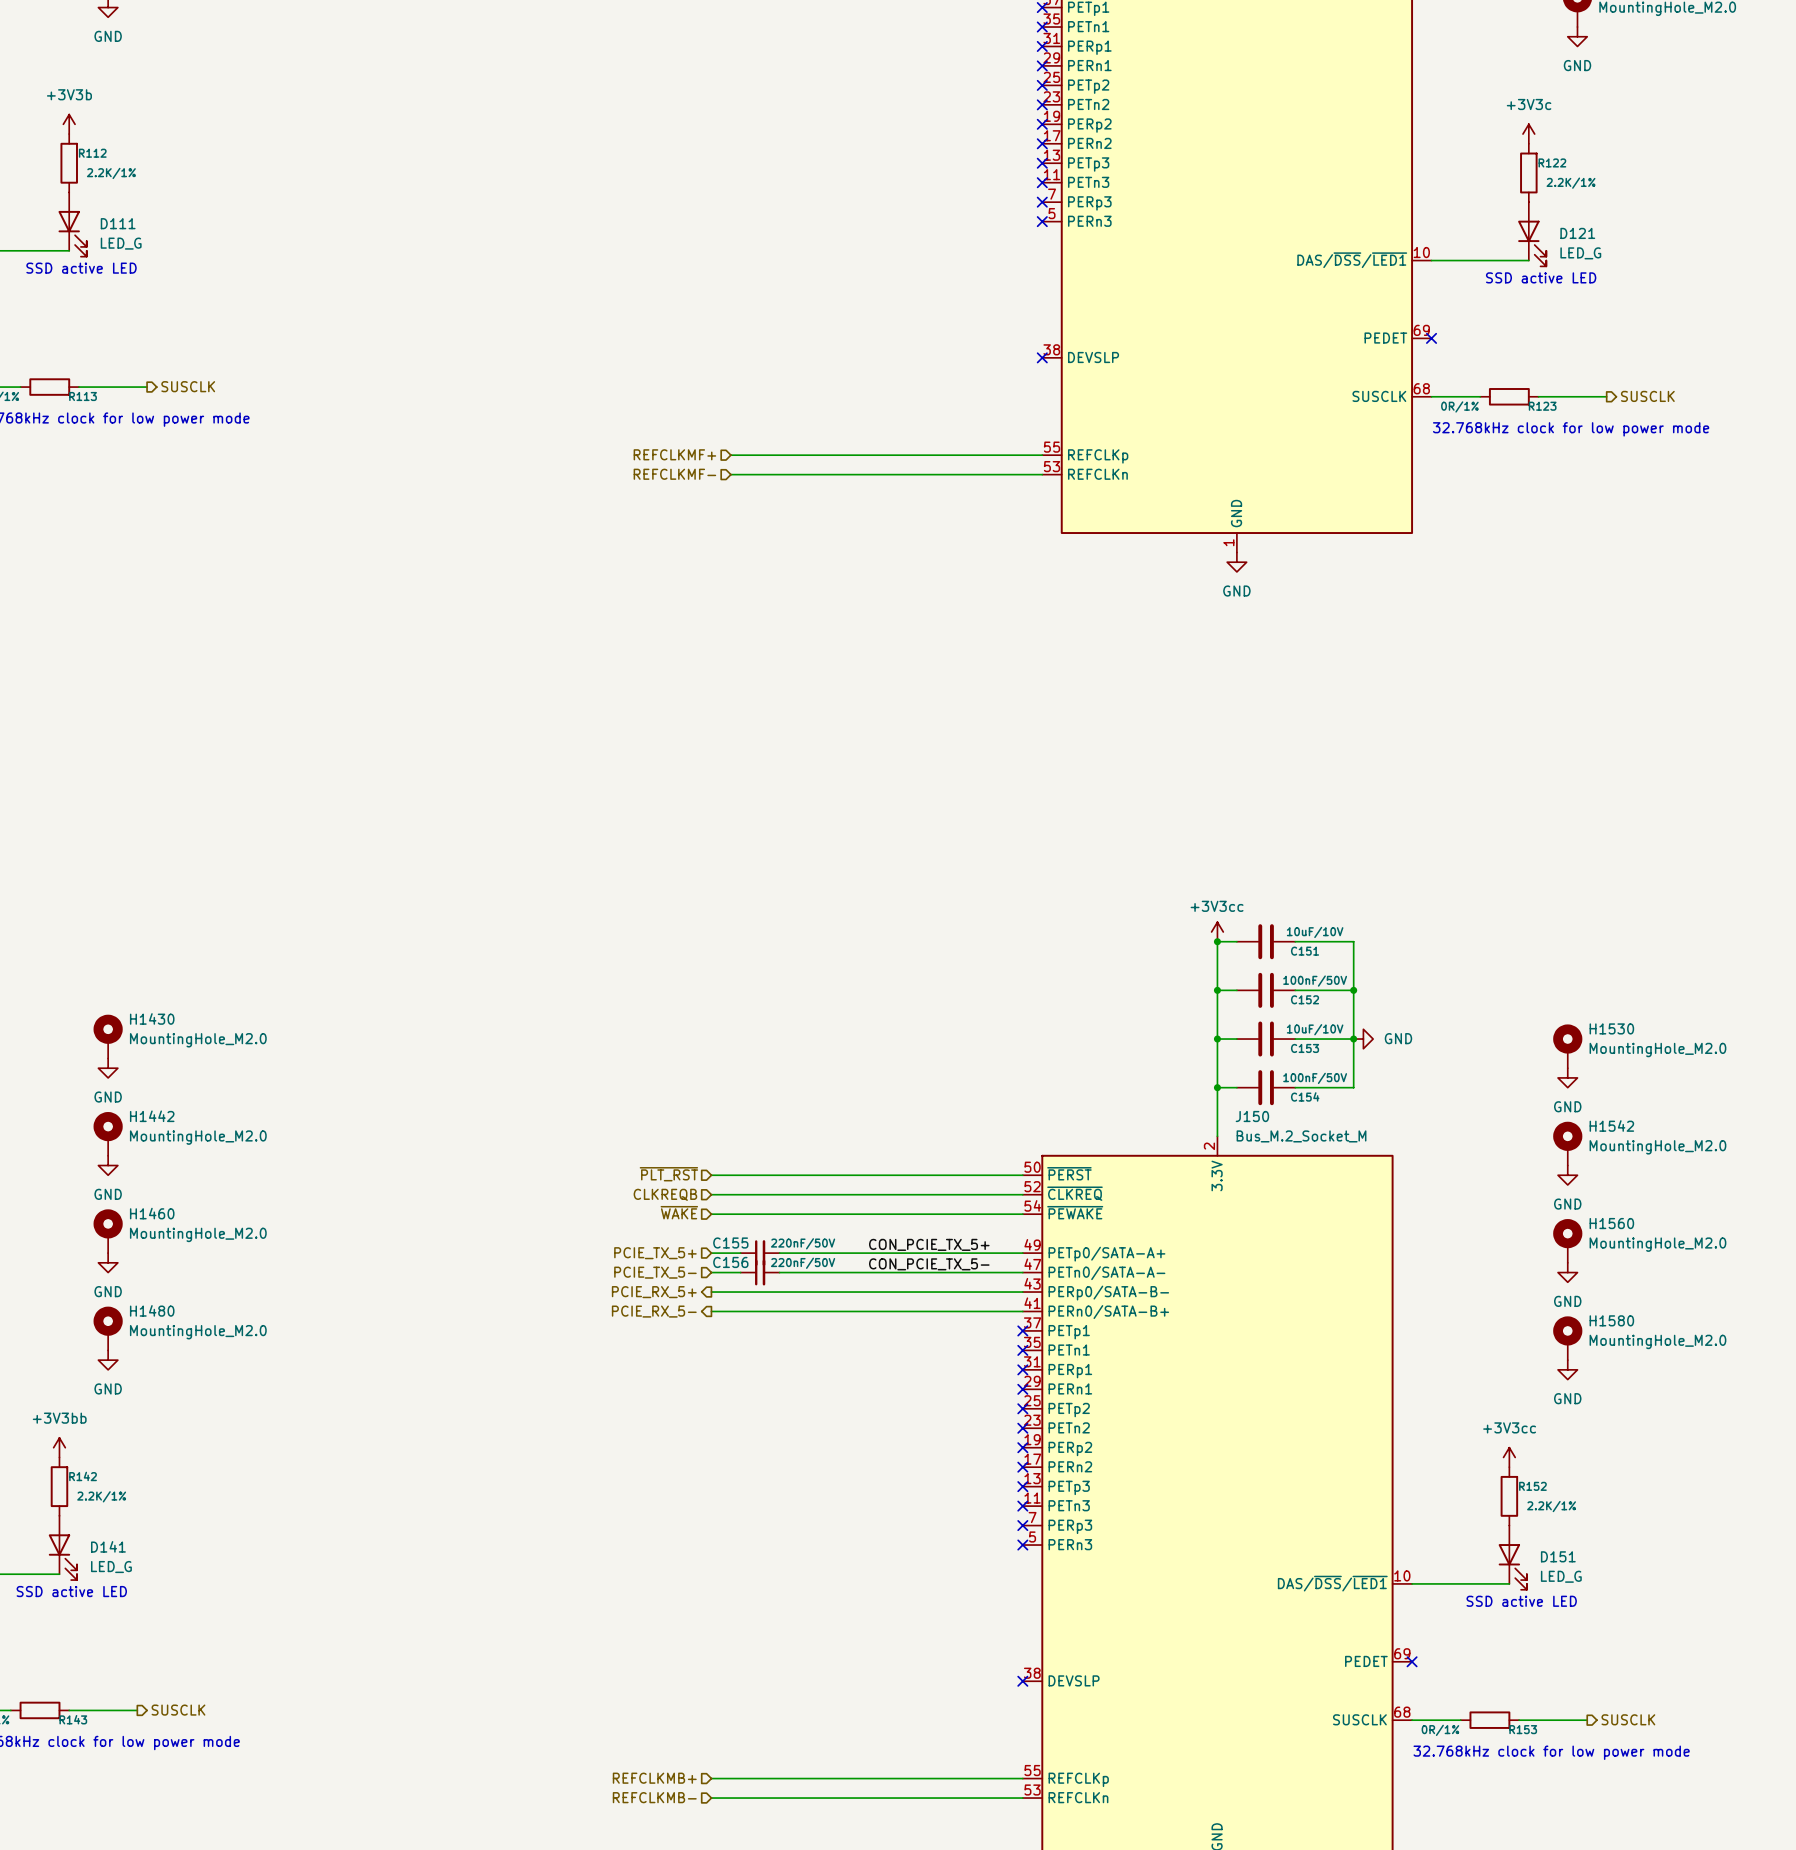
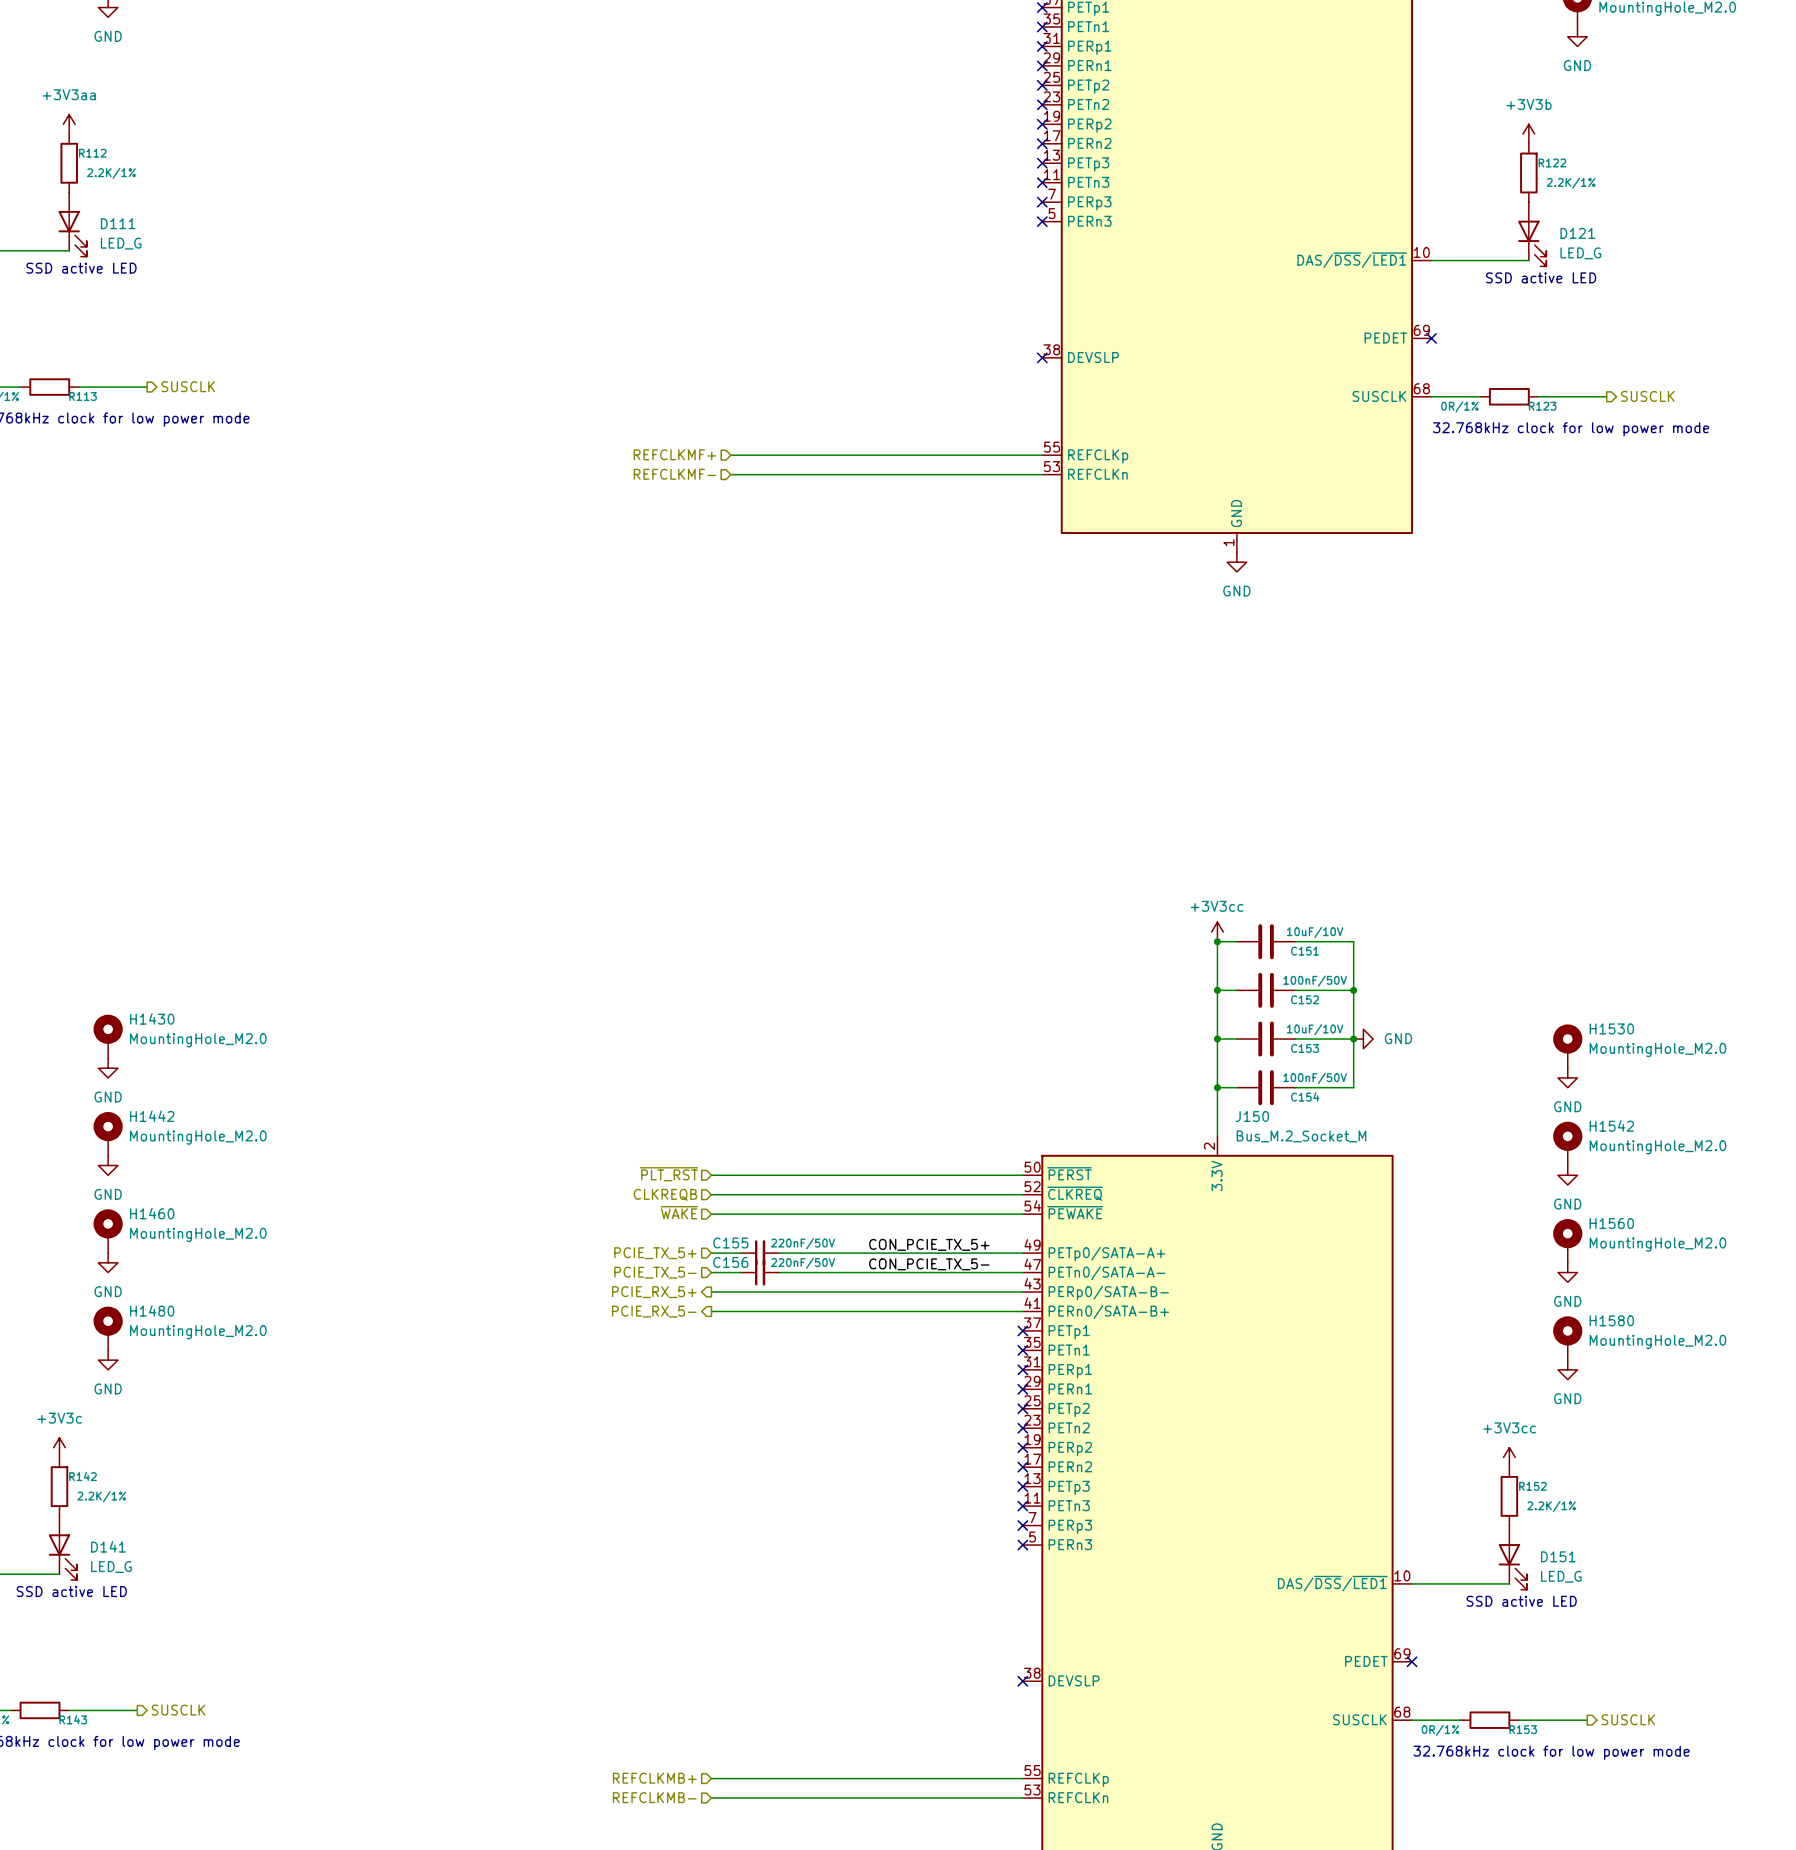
power symbol: +3V3b (69, 124) -> +3V3aa (69, 124)
power symbol: +3V3c (1528, 134) -> +3V3b (1528, 134)
power symbol: +3V3bb (59, 1447) -> +3V3c (59, 1447)

